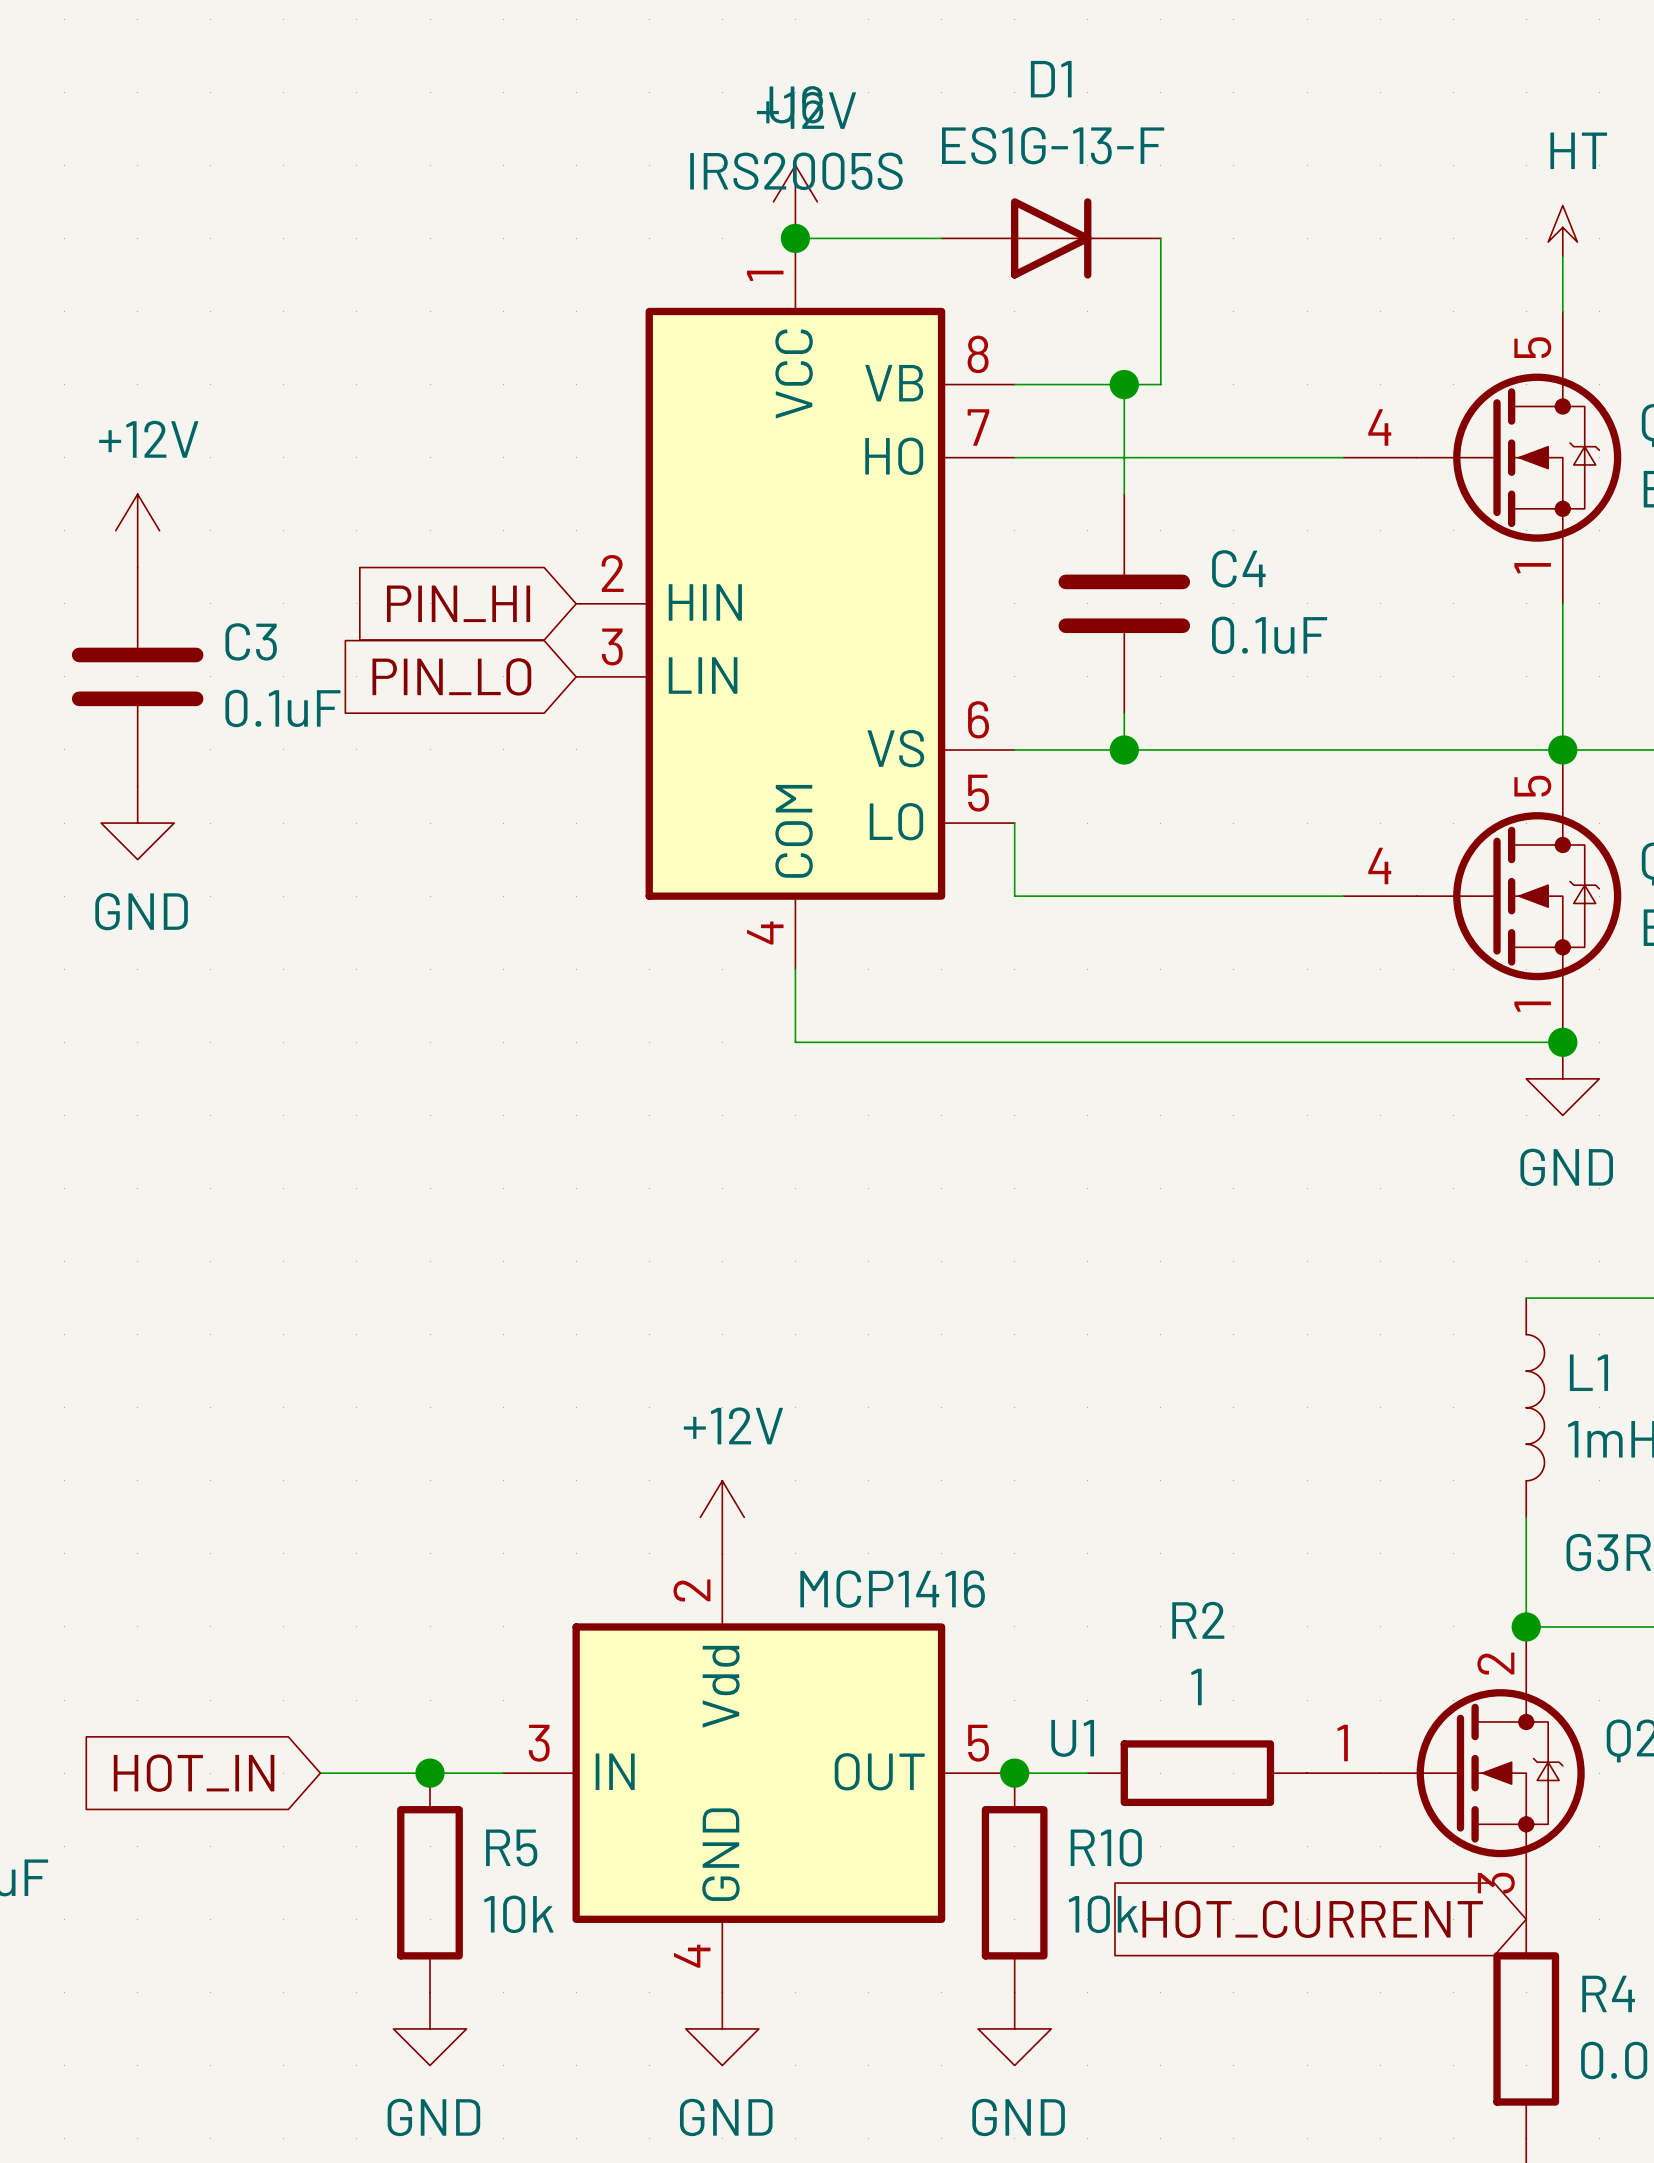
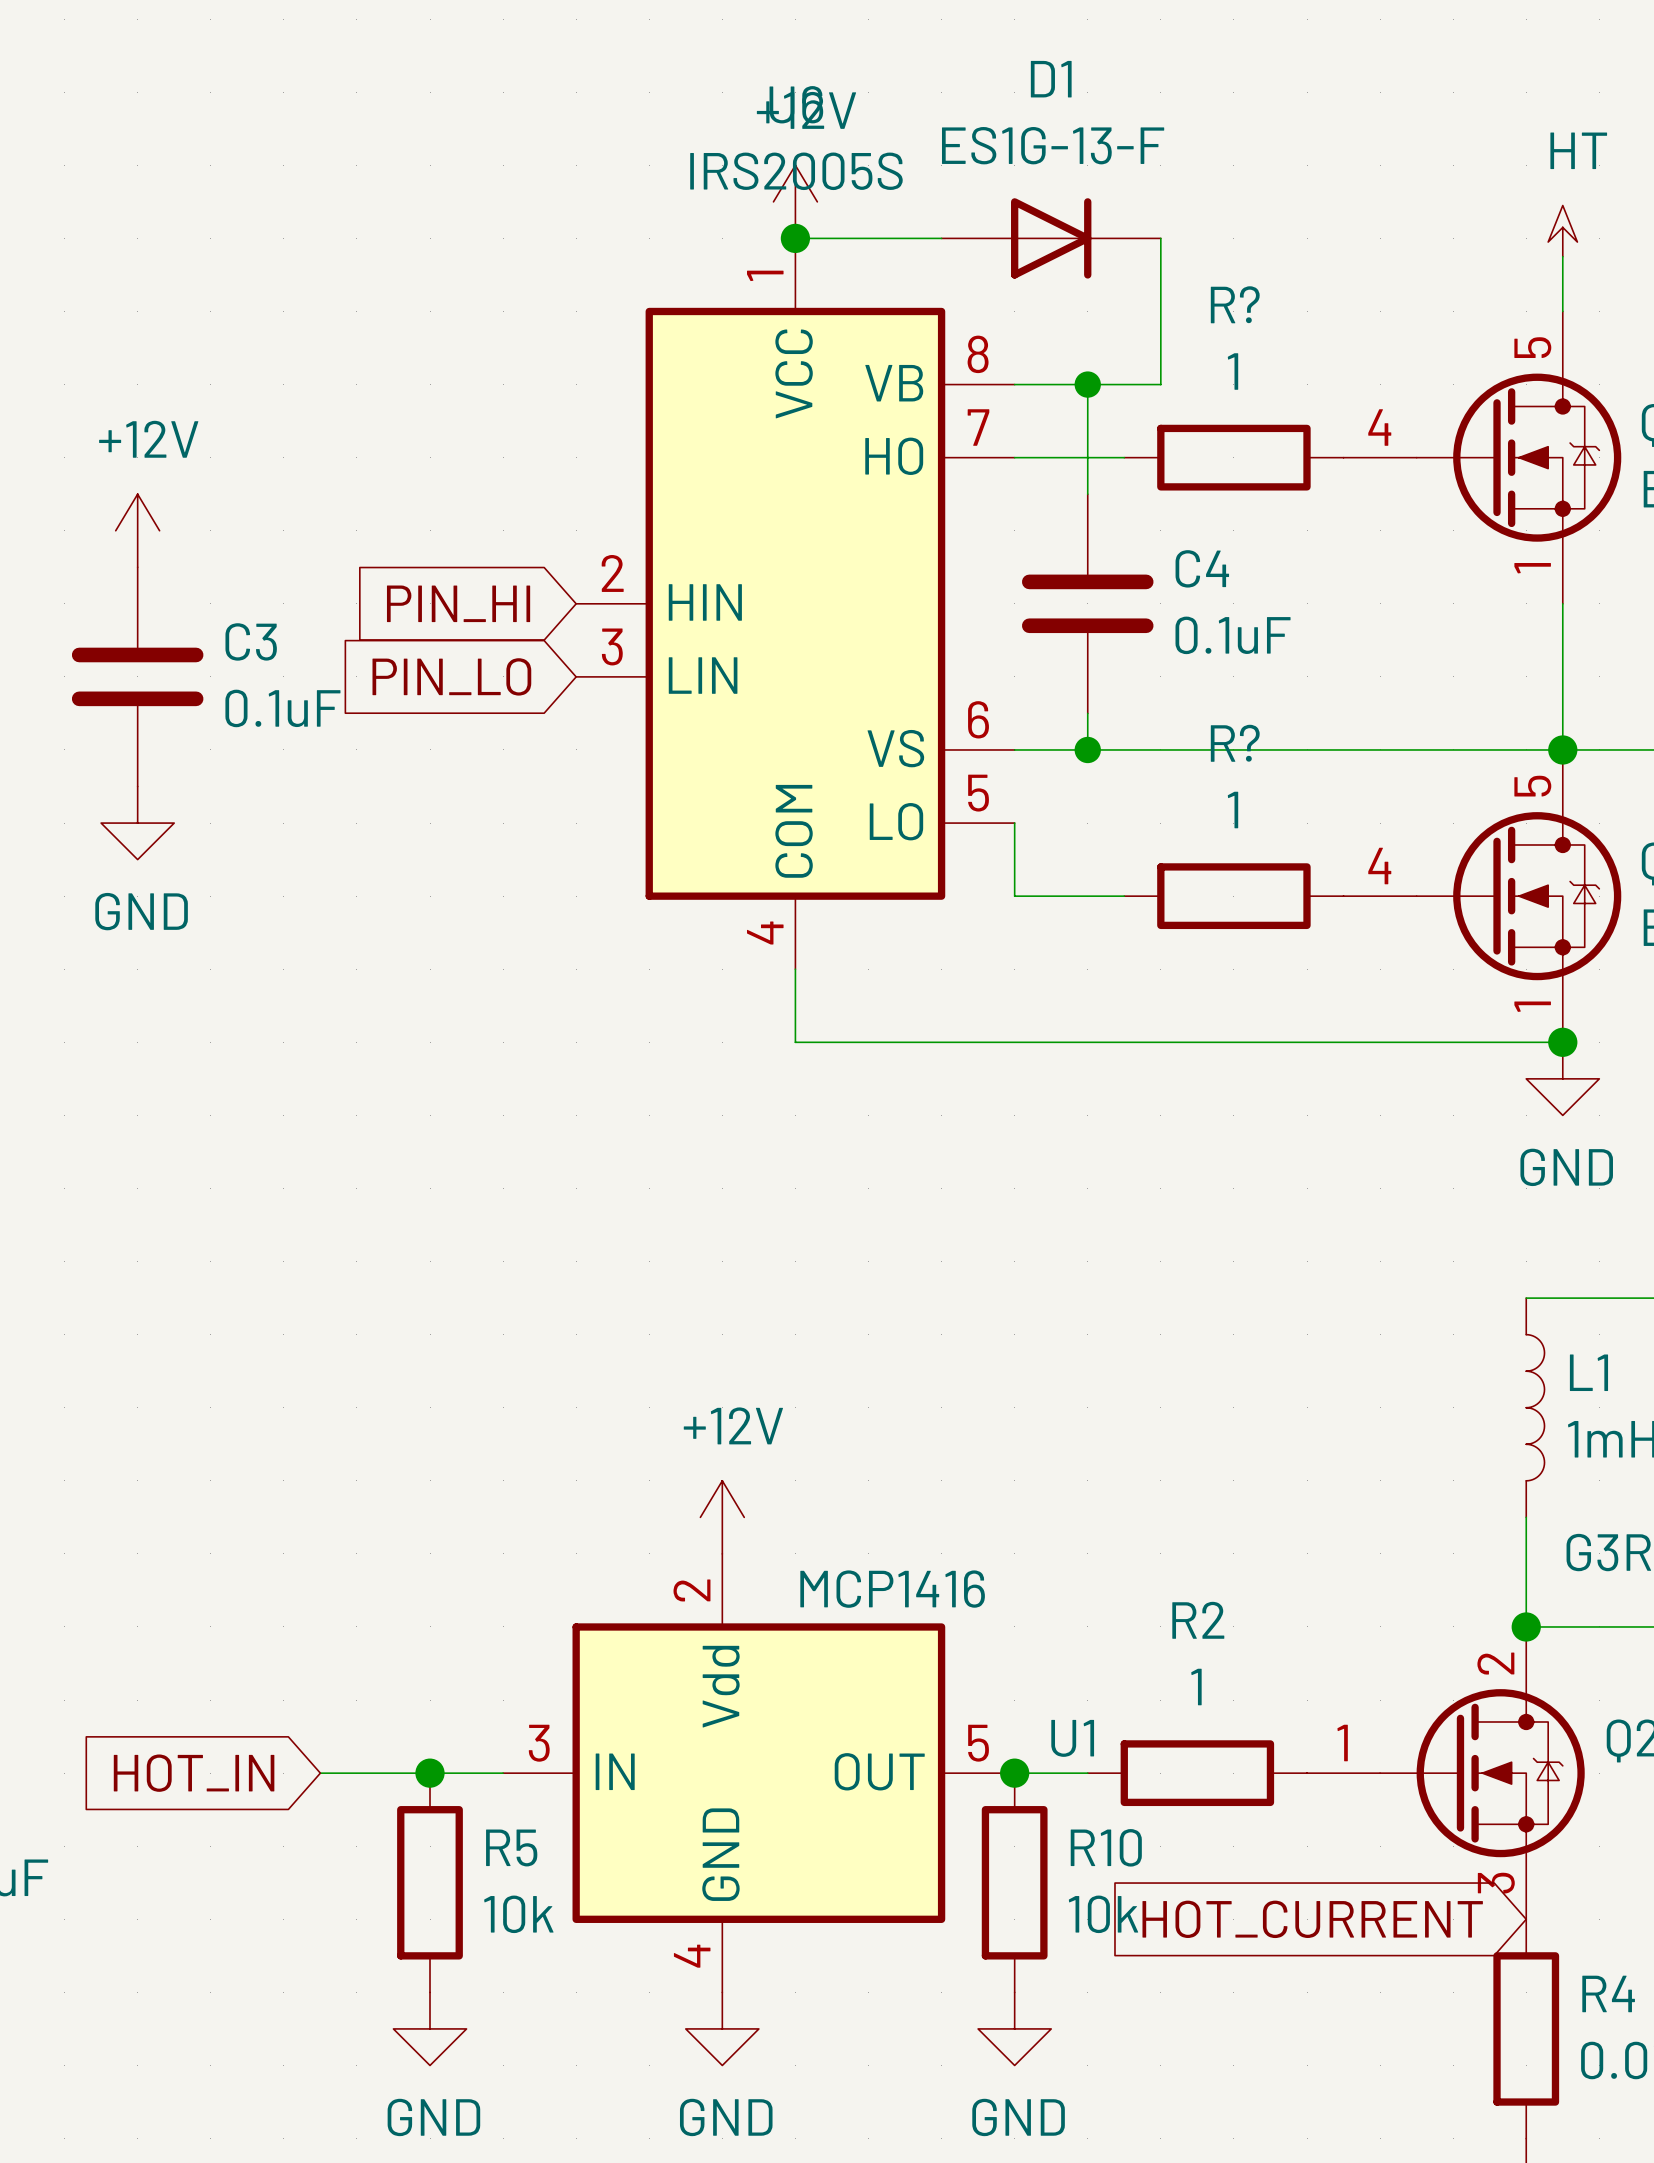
junction: none -> (1087, 384)
wire: (1124, 384) (1124, 494) -> (1087, 384) (1087, 494)
junction: (1124, 384) -> none
wire: (1124, 457) (1343, 457) -> none
R?: none -> 1 (1233, 457)
C4 position: (1124, 603) -> (1087, 603)
wire: (1124, 713) (1124, 749) -> (1087, 713) (1087, 749)
junction: none -> (1087, 749)
junction: (1124, 749) -> none
wire: (1124, 896) (1343, 896) -> none
R?: none -> 1 (1233, 896)

